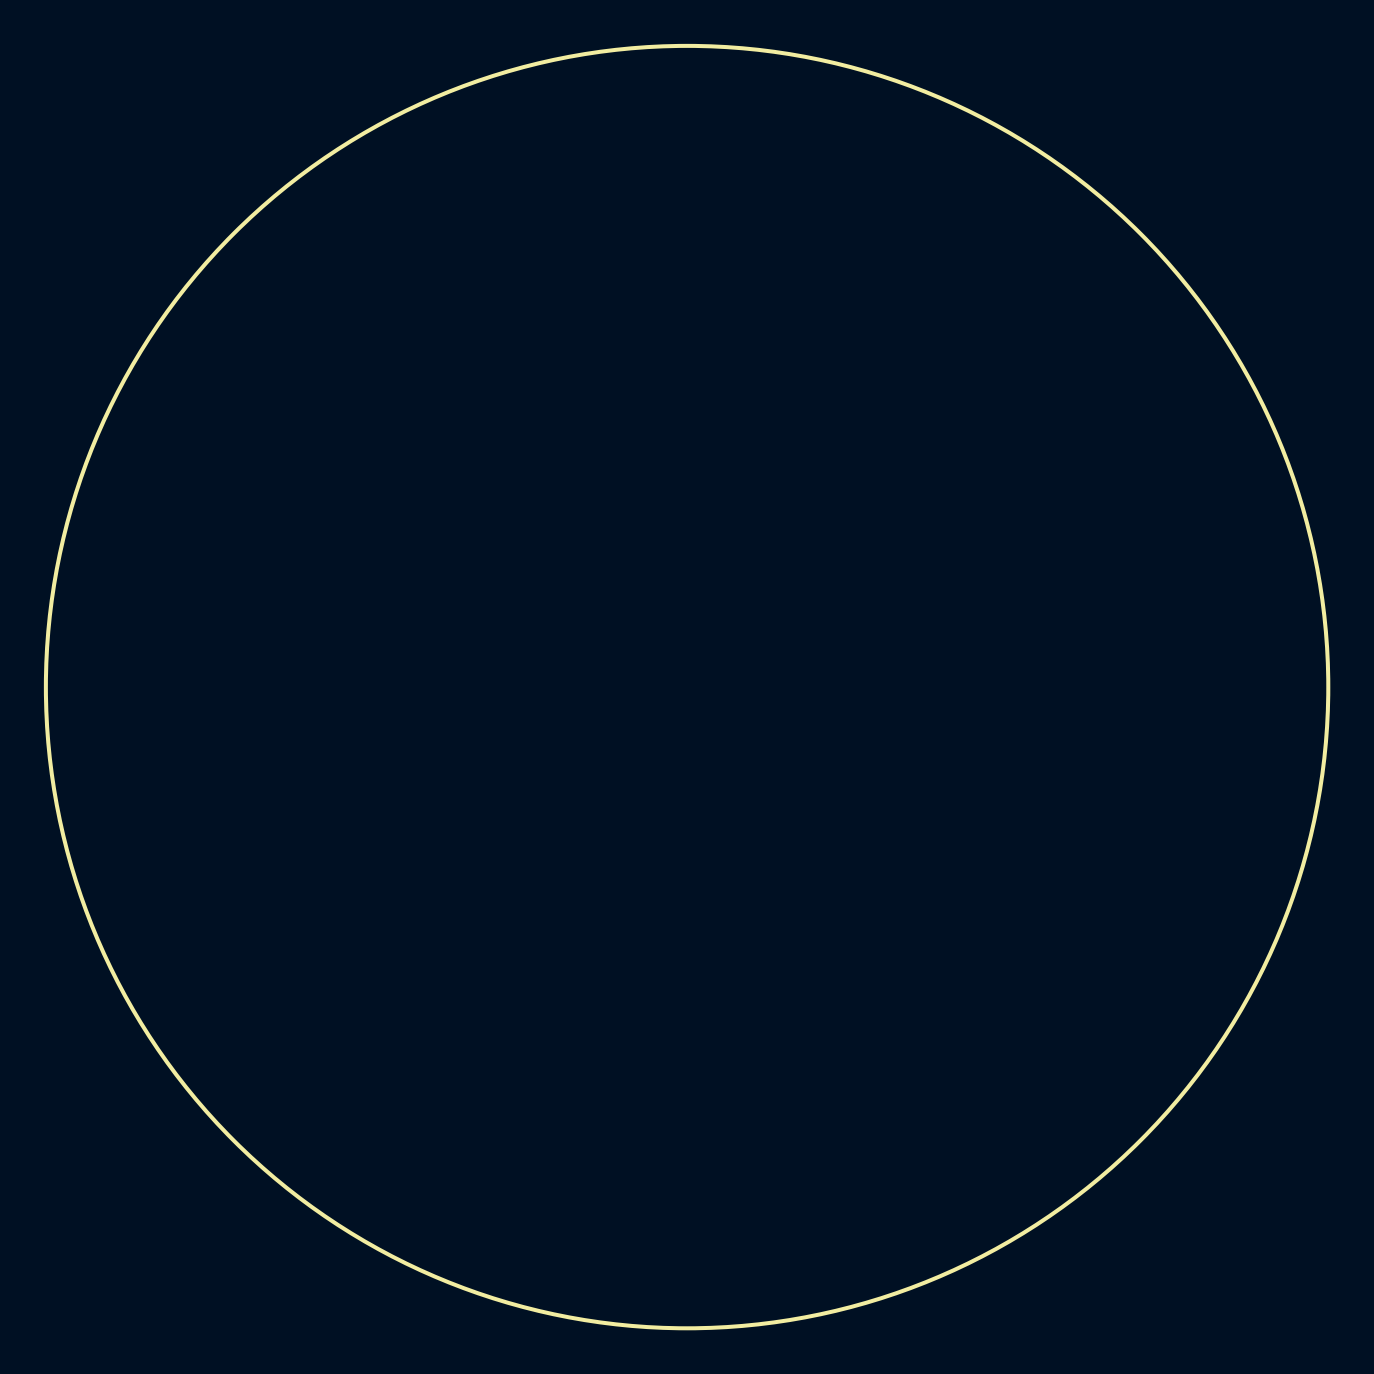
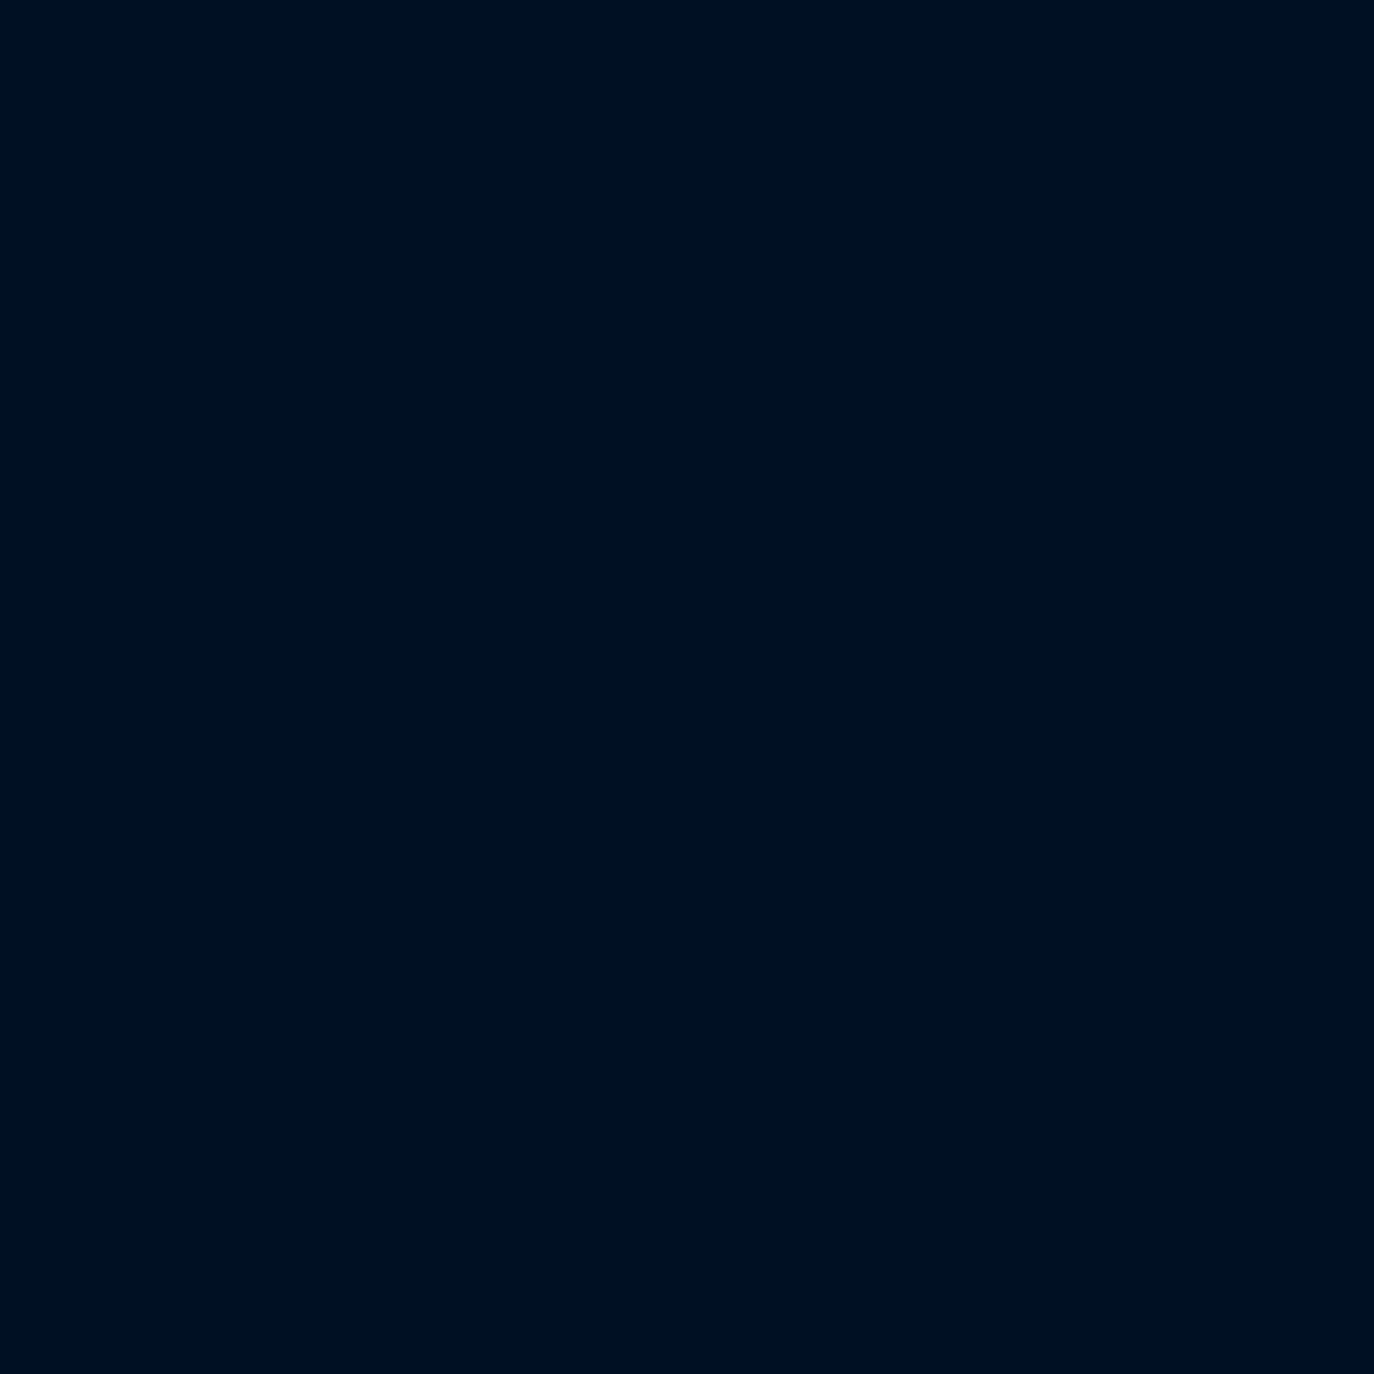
drawing: [43, 43, 1331, 1331] -> none

